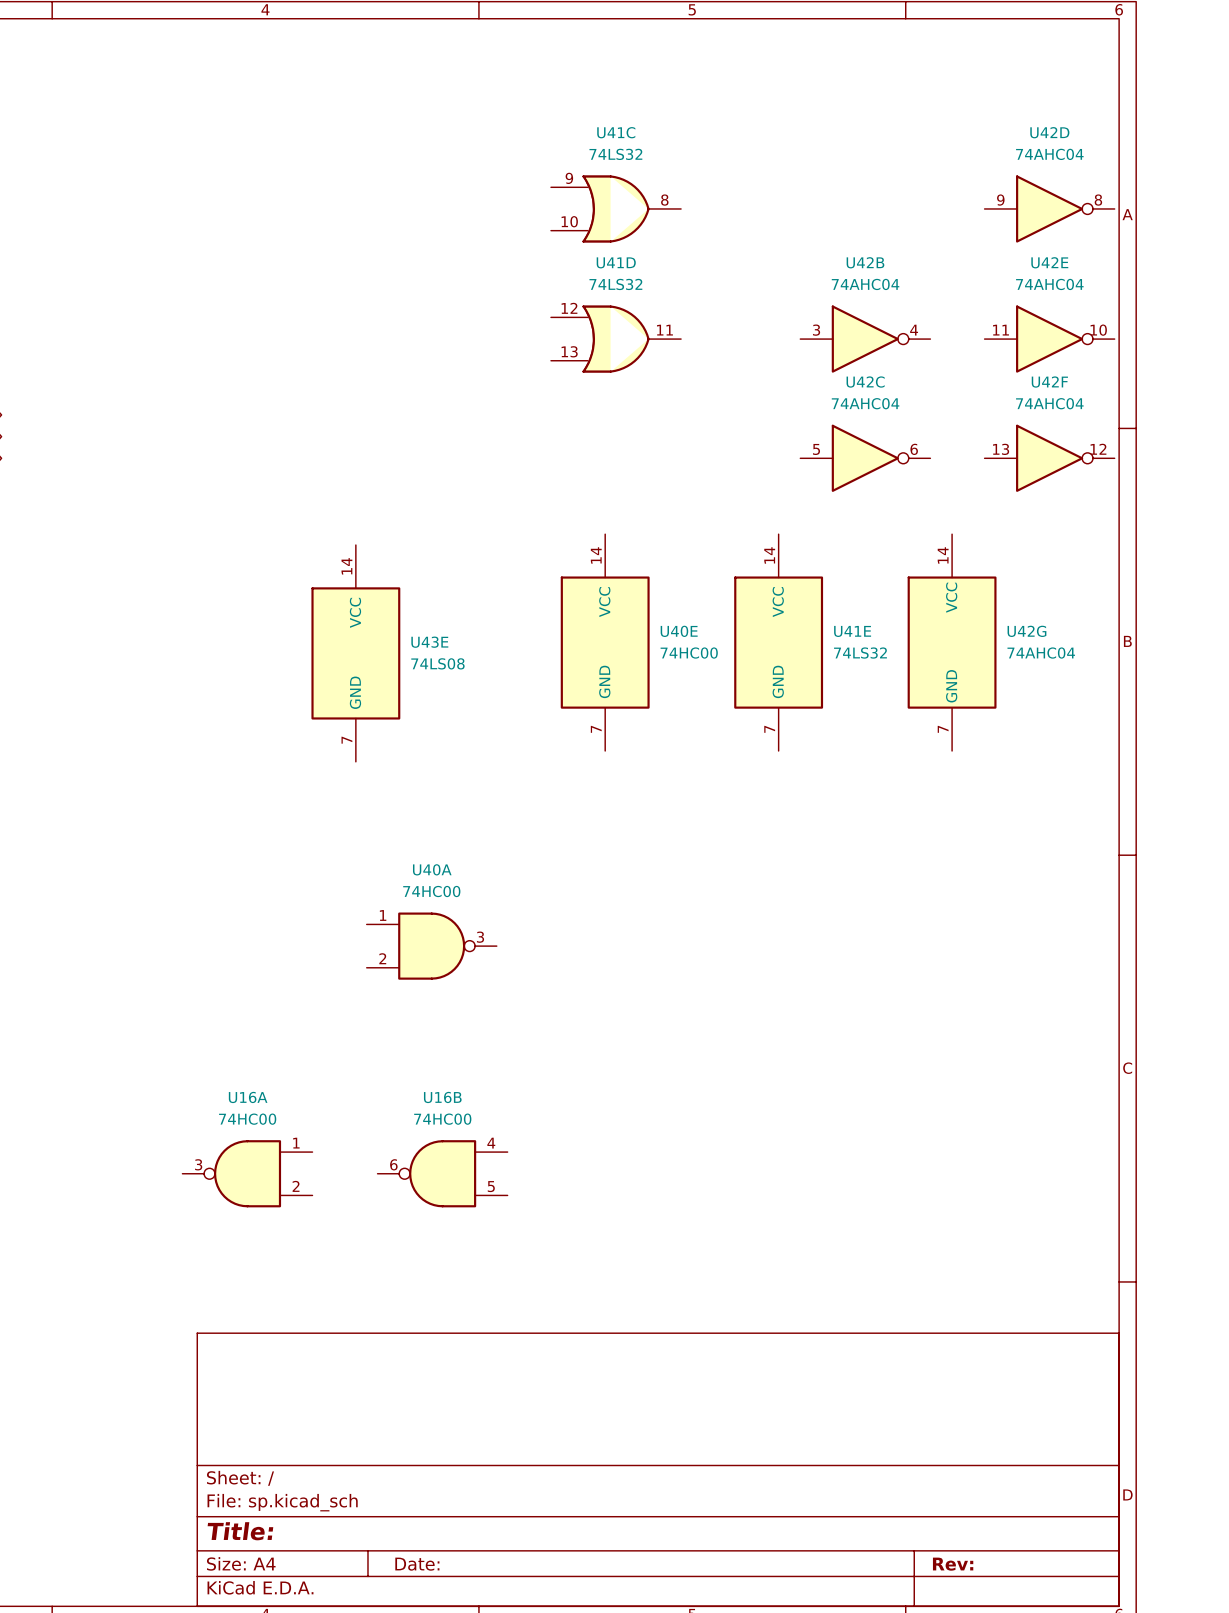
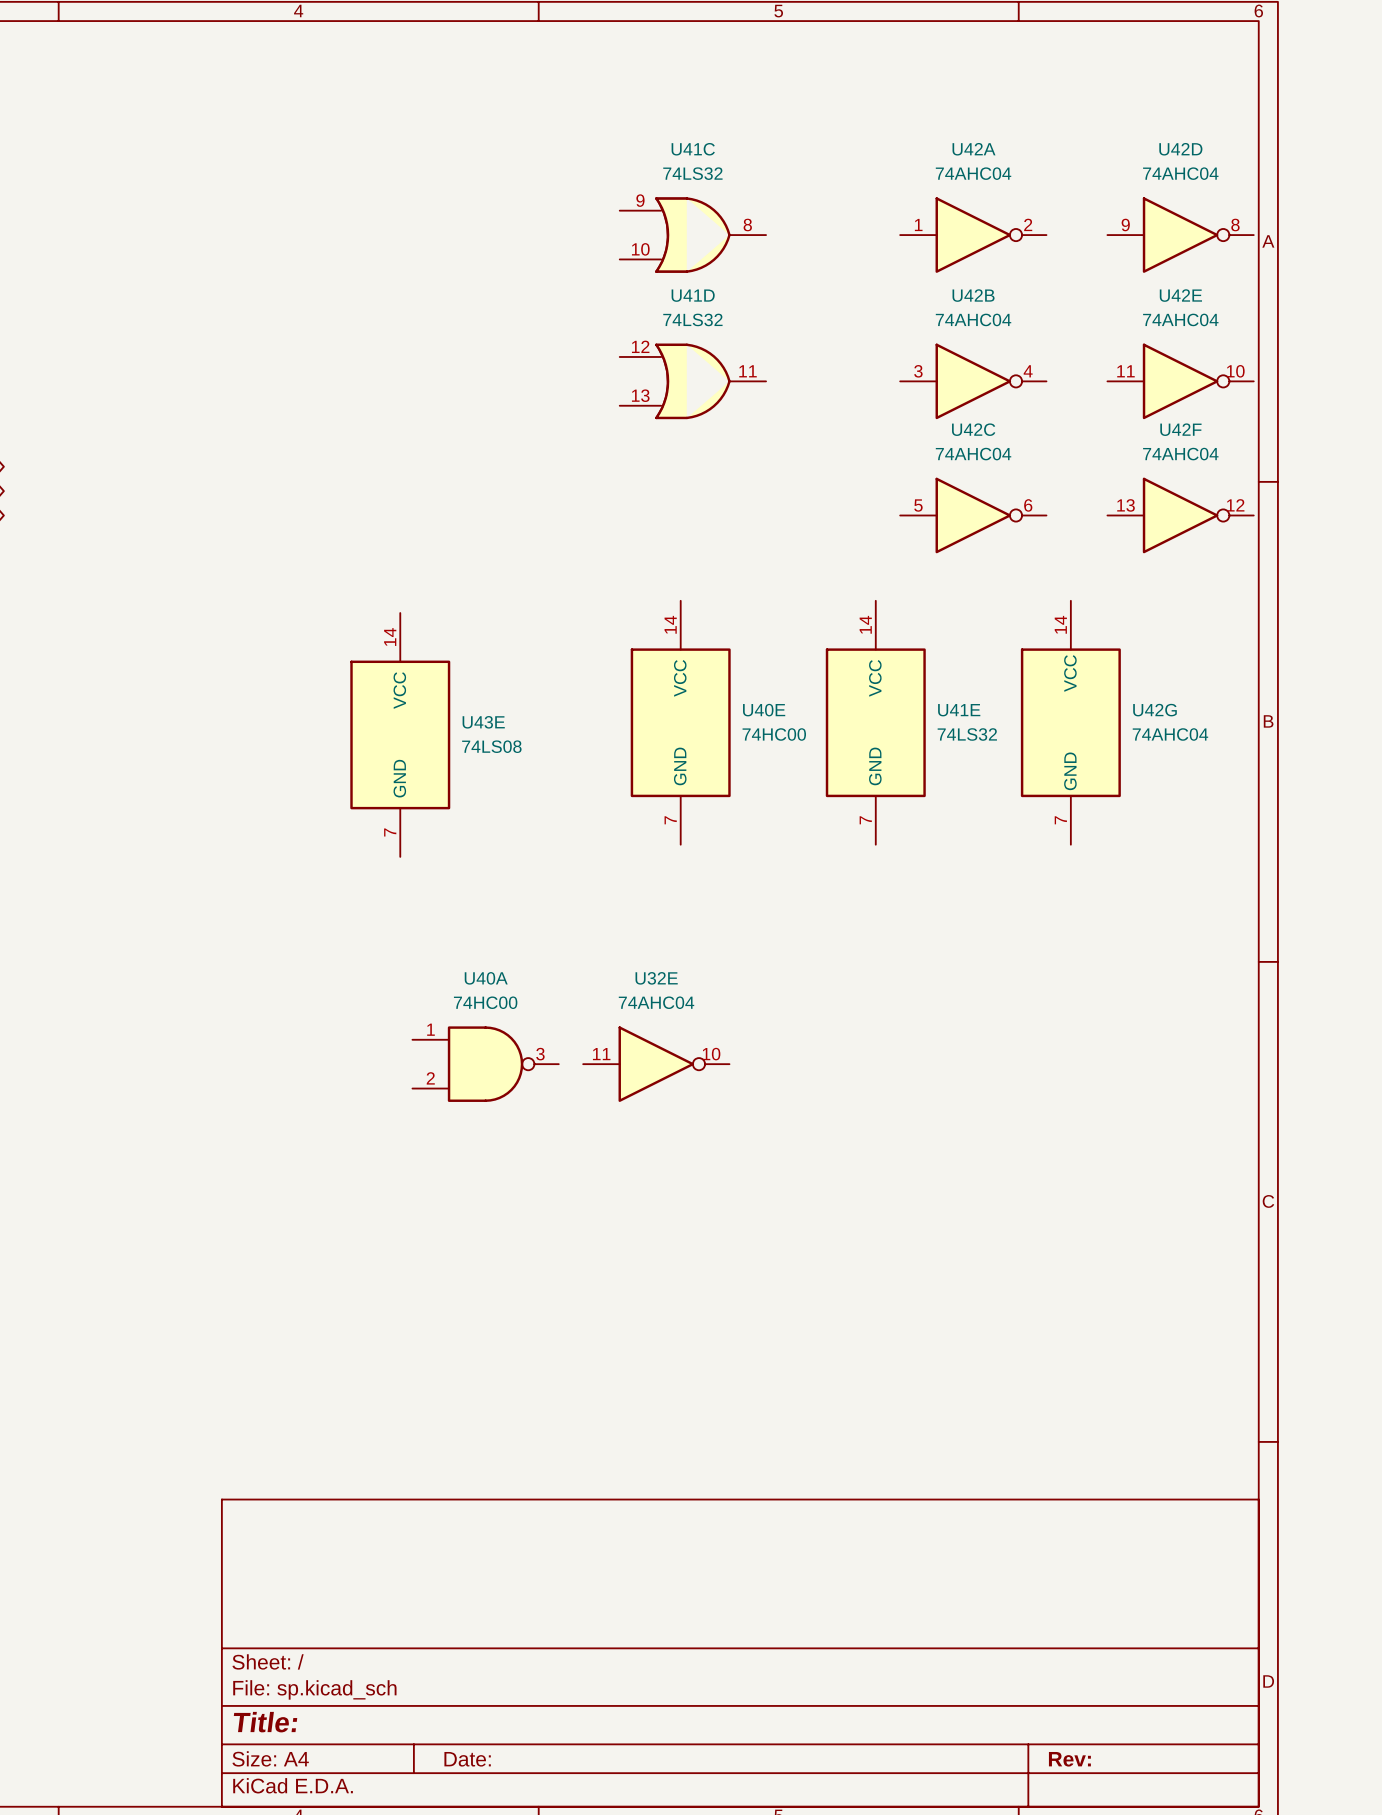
U42A: none -> 74AHC04 (973, 235)
U32E: none -> 74AHC04 (656, 1064)
U16A: 74HC00 (247, 1173) -> none
U16B: 74HC00 (442, 1173) -> none

